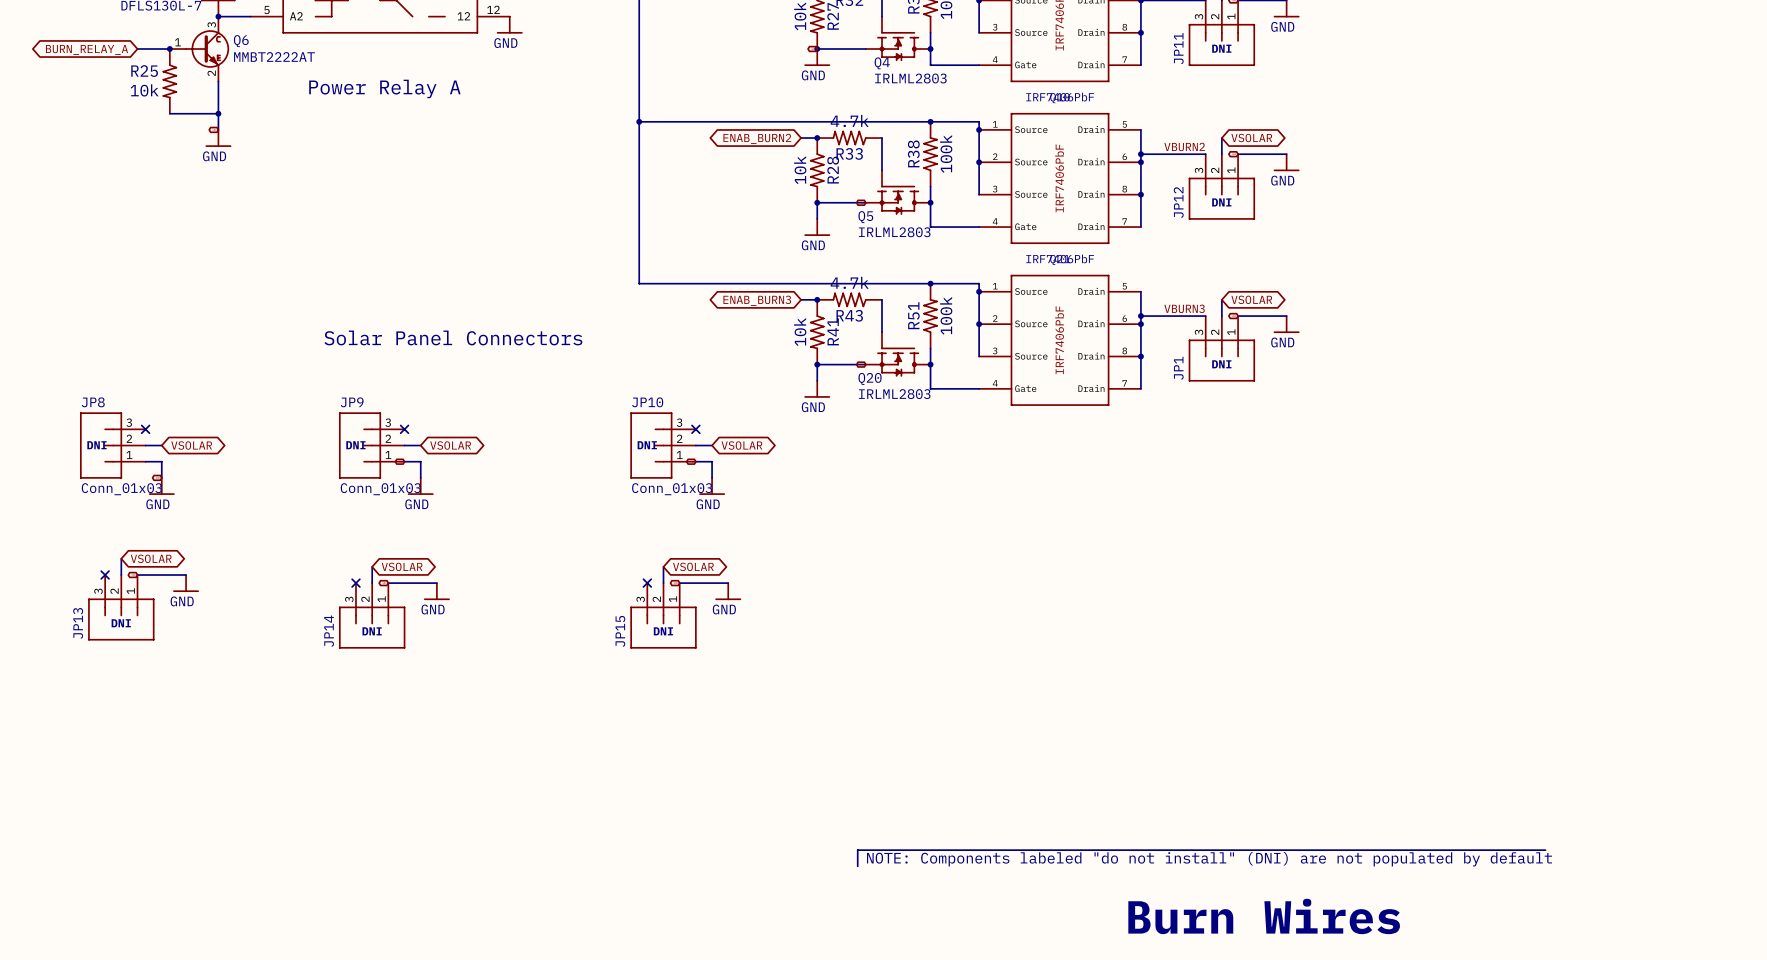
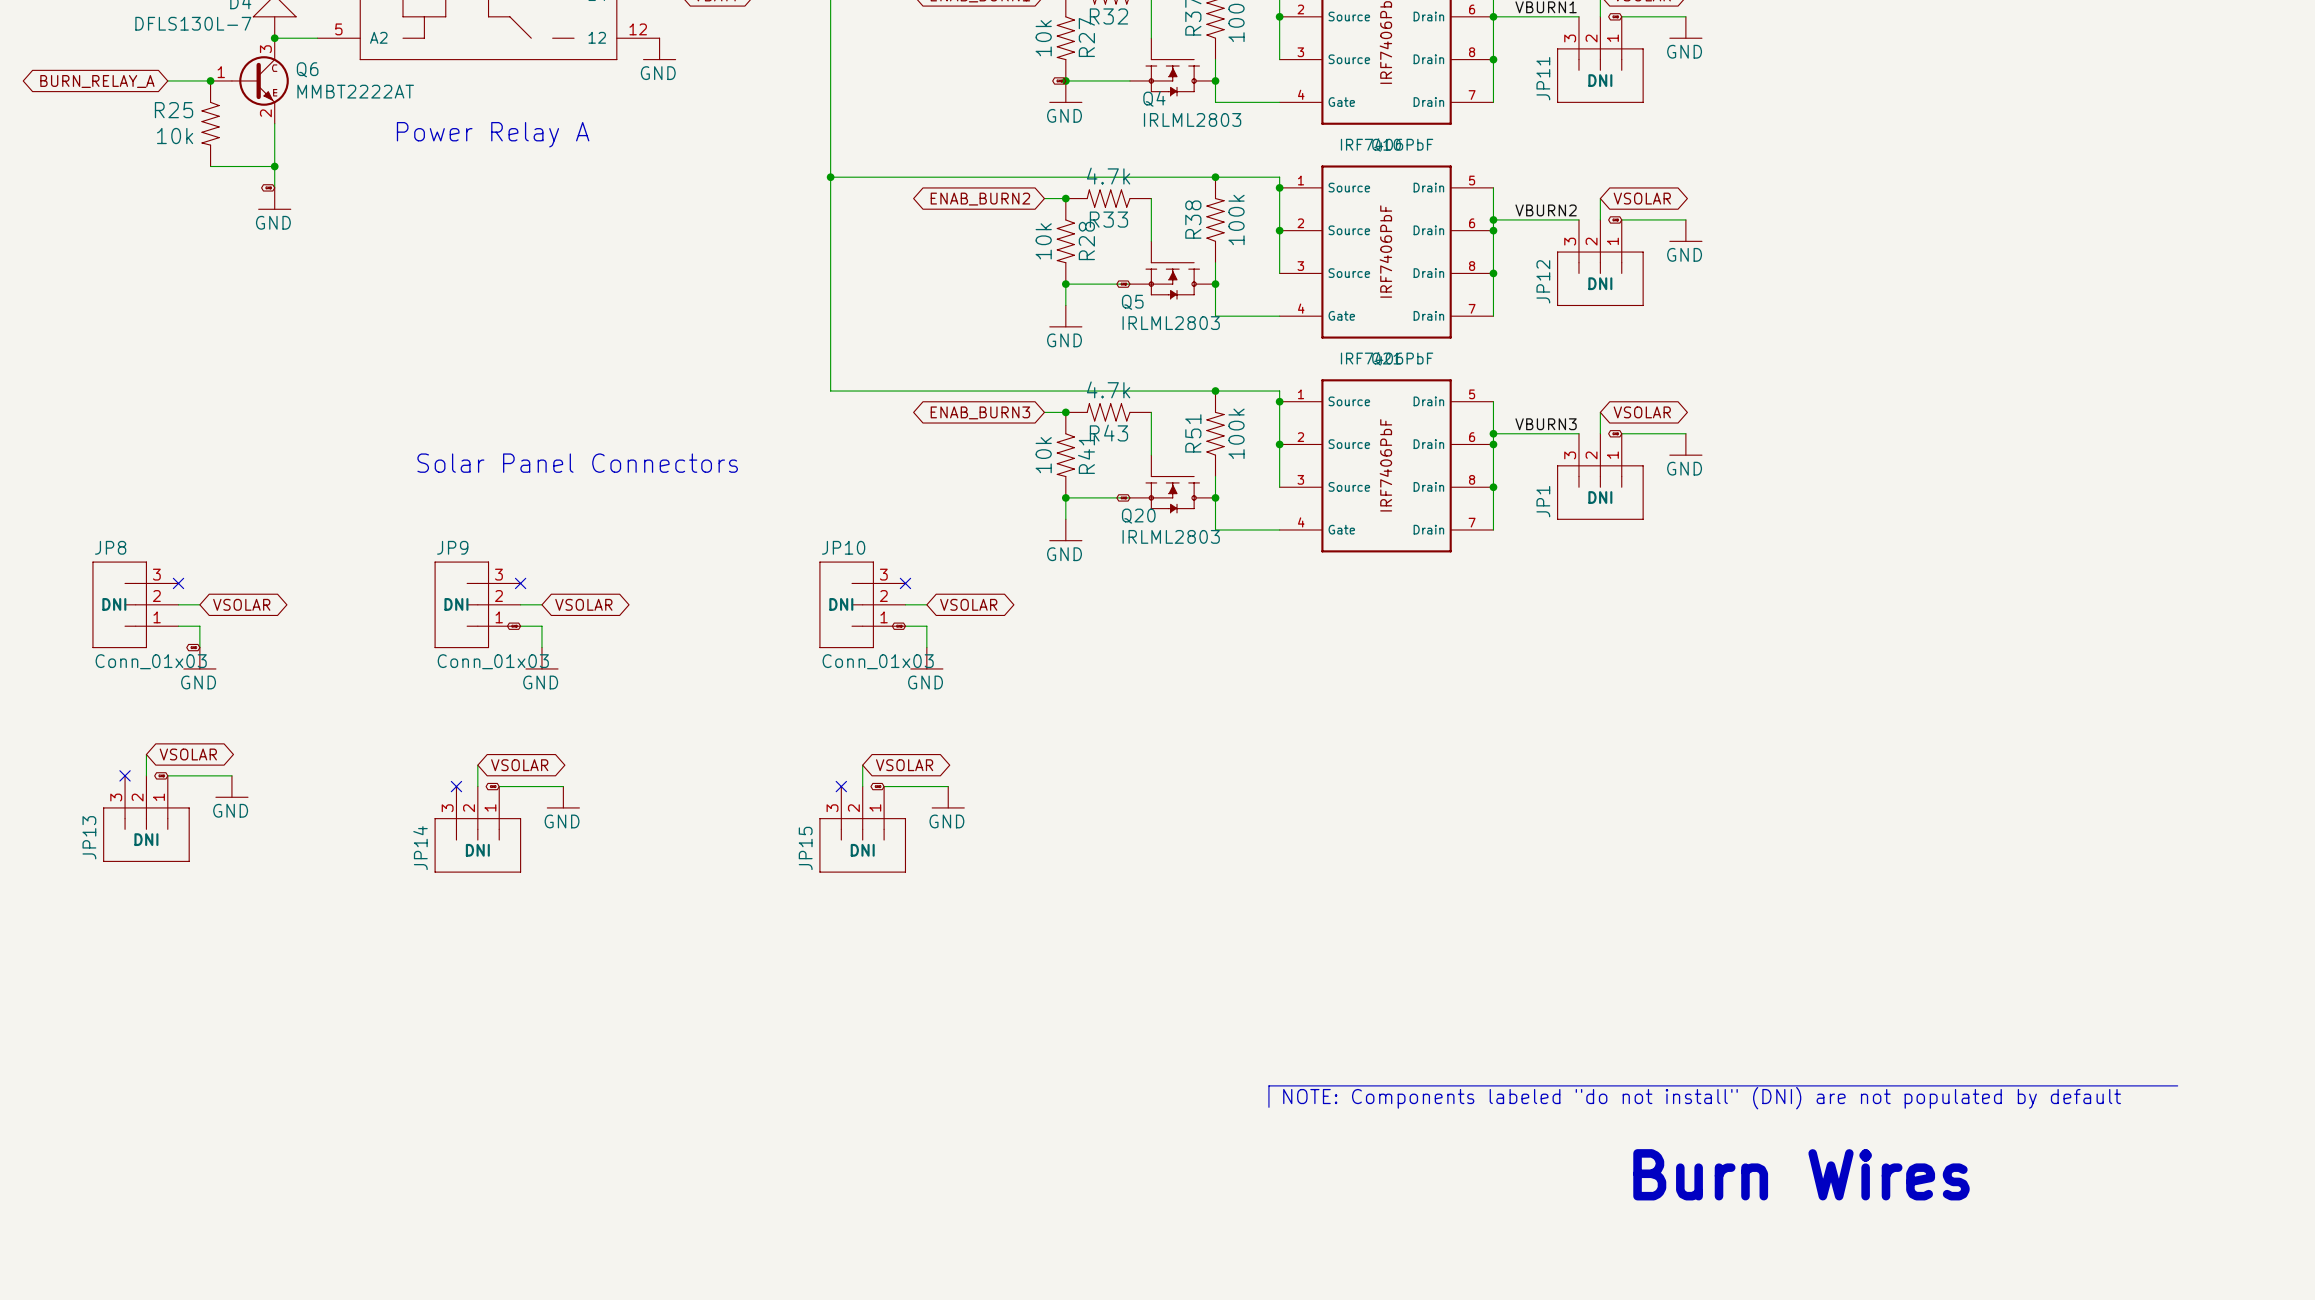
line: (1545, 850) (857, 850) (857, 866) -> (2177, 1085) (1268, 1085) (1268, 1107)
text position: NOTE: Components labeled "do not install" (DNI) are not populated by default (1209, 859) -> NOTE: Components labeled "do not install" (DNI) are not populated by default (1702, 1098)
text position: Burn Wires (1264, 916) -> Burn Wires (1801, 1174)

